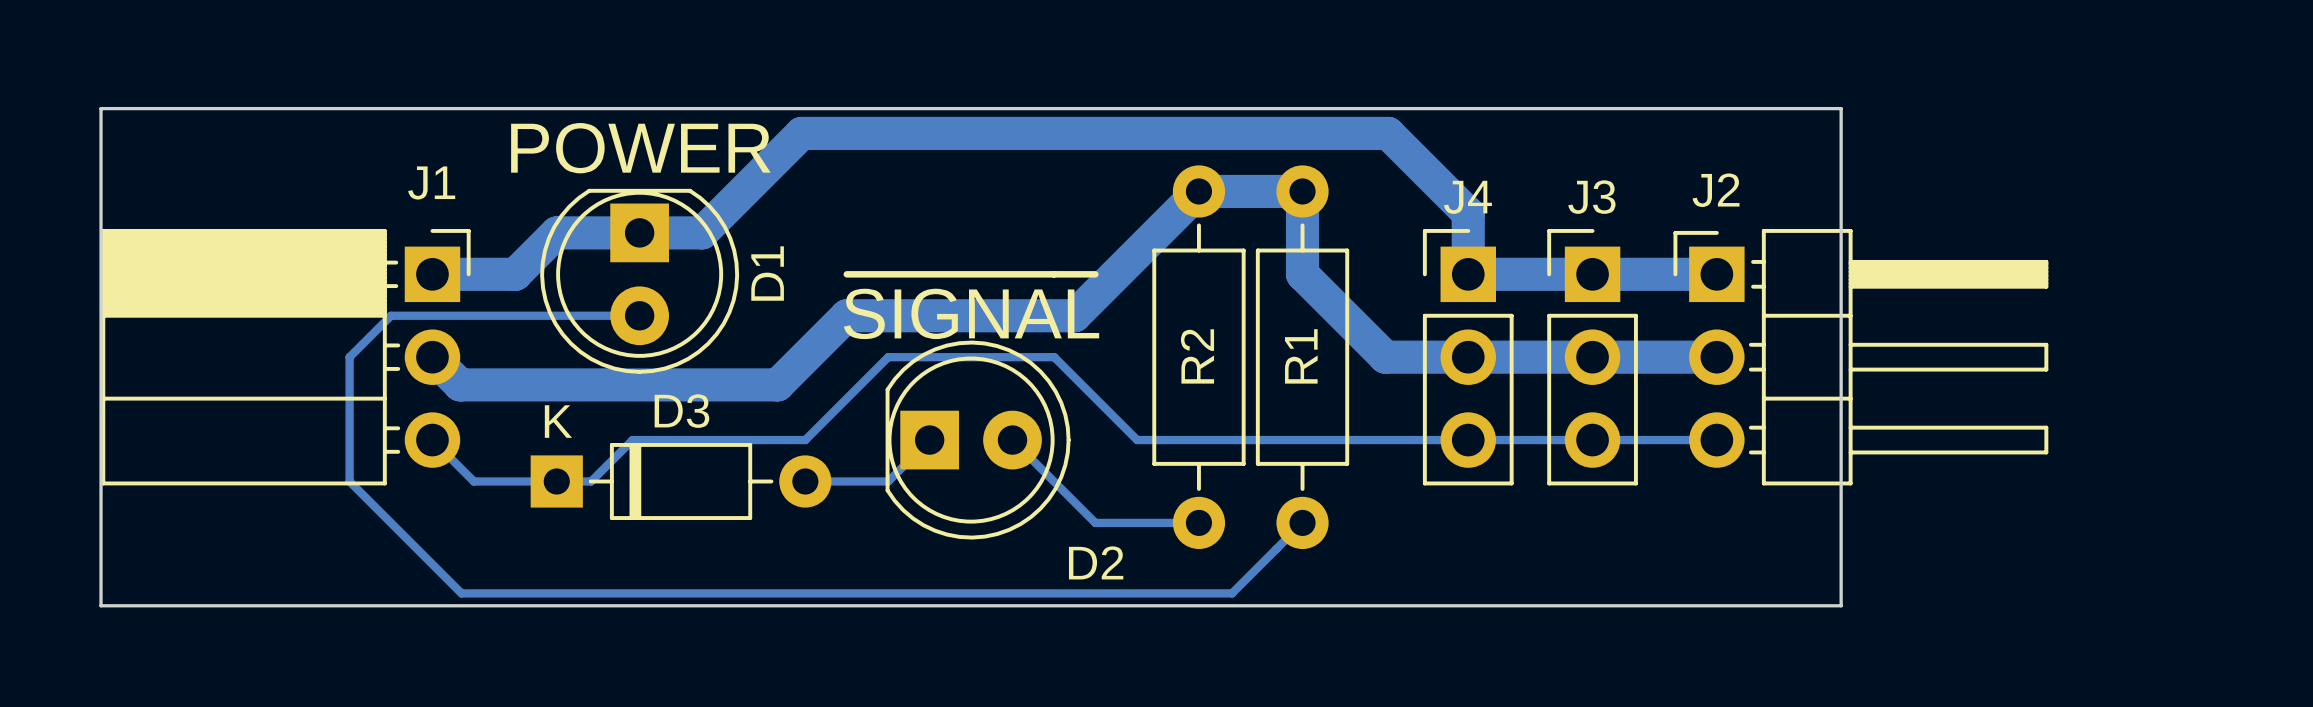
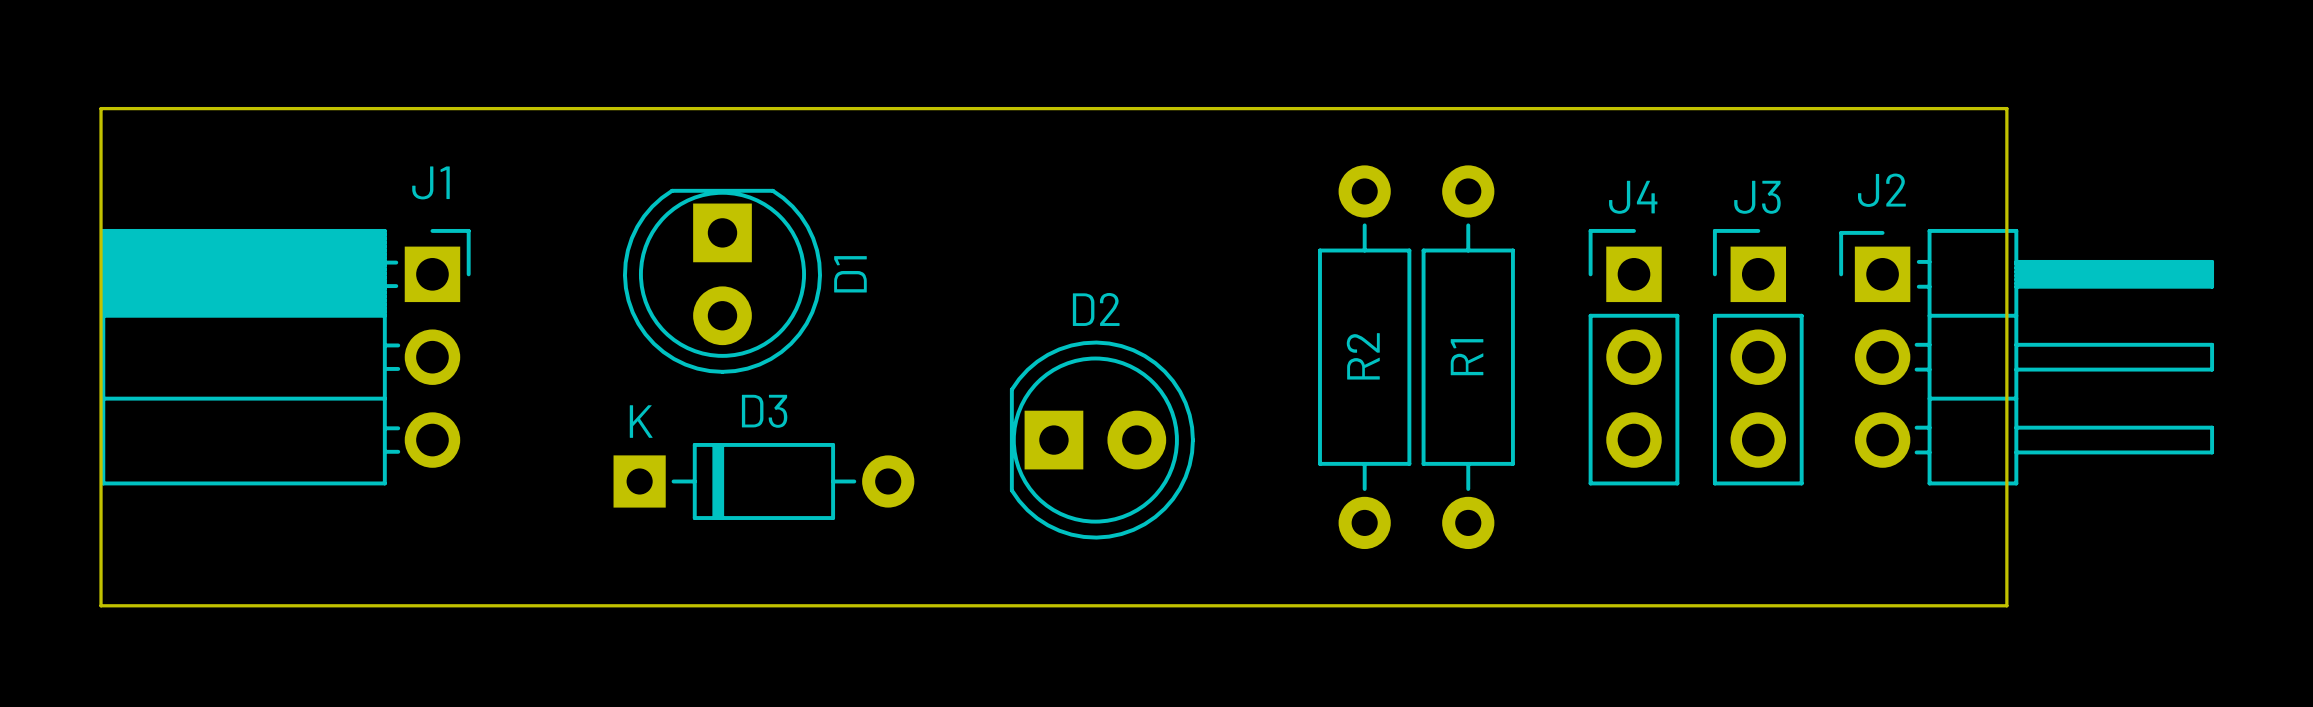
board edge: (1841, 108) (1841, 605) -> (1841, 108) (2006, 108) (2006, 605) (1841, 605)
text: POWER (640, 148) -> none
bottom track: (432, 274) (515, 274) (556, 232) (702, 232) (801, 133) (1388, 133) (1468, 213) (1468, 274) (1716, 274) -> none
line: (846, 274) (1095, 274) -> none
D1 position: (639, 281) -> (722, 281)
text: SIGNAL (971, 313) -> none
bottom track: (639, 315) (391, 315) (349, 357) (349, 481) (461, 593) (1232, 593) (1302, 522) -> none
bottom track: (432, 357) (460, 384) (777, 384) (846, 315) (1074, 315) (1198, 191) (1302, 191) (1302, 274) (1385, 357) (1716, 357) -> none
R2 position: (1198, 357) -> (1364, 357)
R1 position: (1302, 357) -> (1468, 357)
J4 position: (1468, 357) -> (1633, 357)
J3 position: (1592, 357) -> (1758, 357)
J2 position: (1860, 357) -> (2026, 357)
bottom track: (432, 440) (473, 481) (591, 481) (632, 440) (805, 440) (888, 357) (1054, 357) (1137, 440) (1716, 440) -> none
bottom track: (929, 440) (888, 481) (805, 481) -> none
D2 position: (978, 440) -> (1102, 440)
bottom track: (1012, 440) (1095, 522) (1198, 522) -> none
D3 position: (681, 481) -> (763, 481)
D2 name position: D2 (1096, 562) -> D2 (1096, 309)

